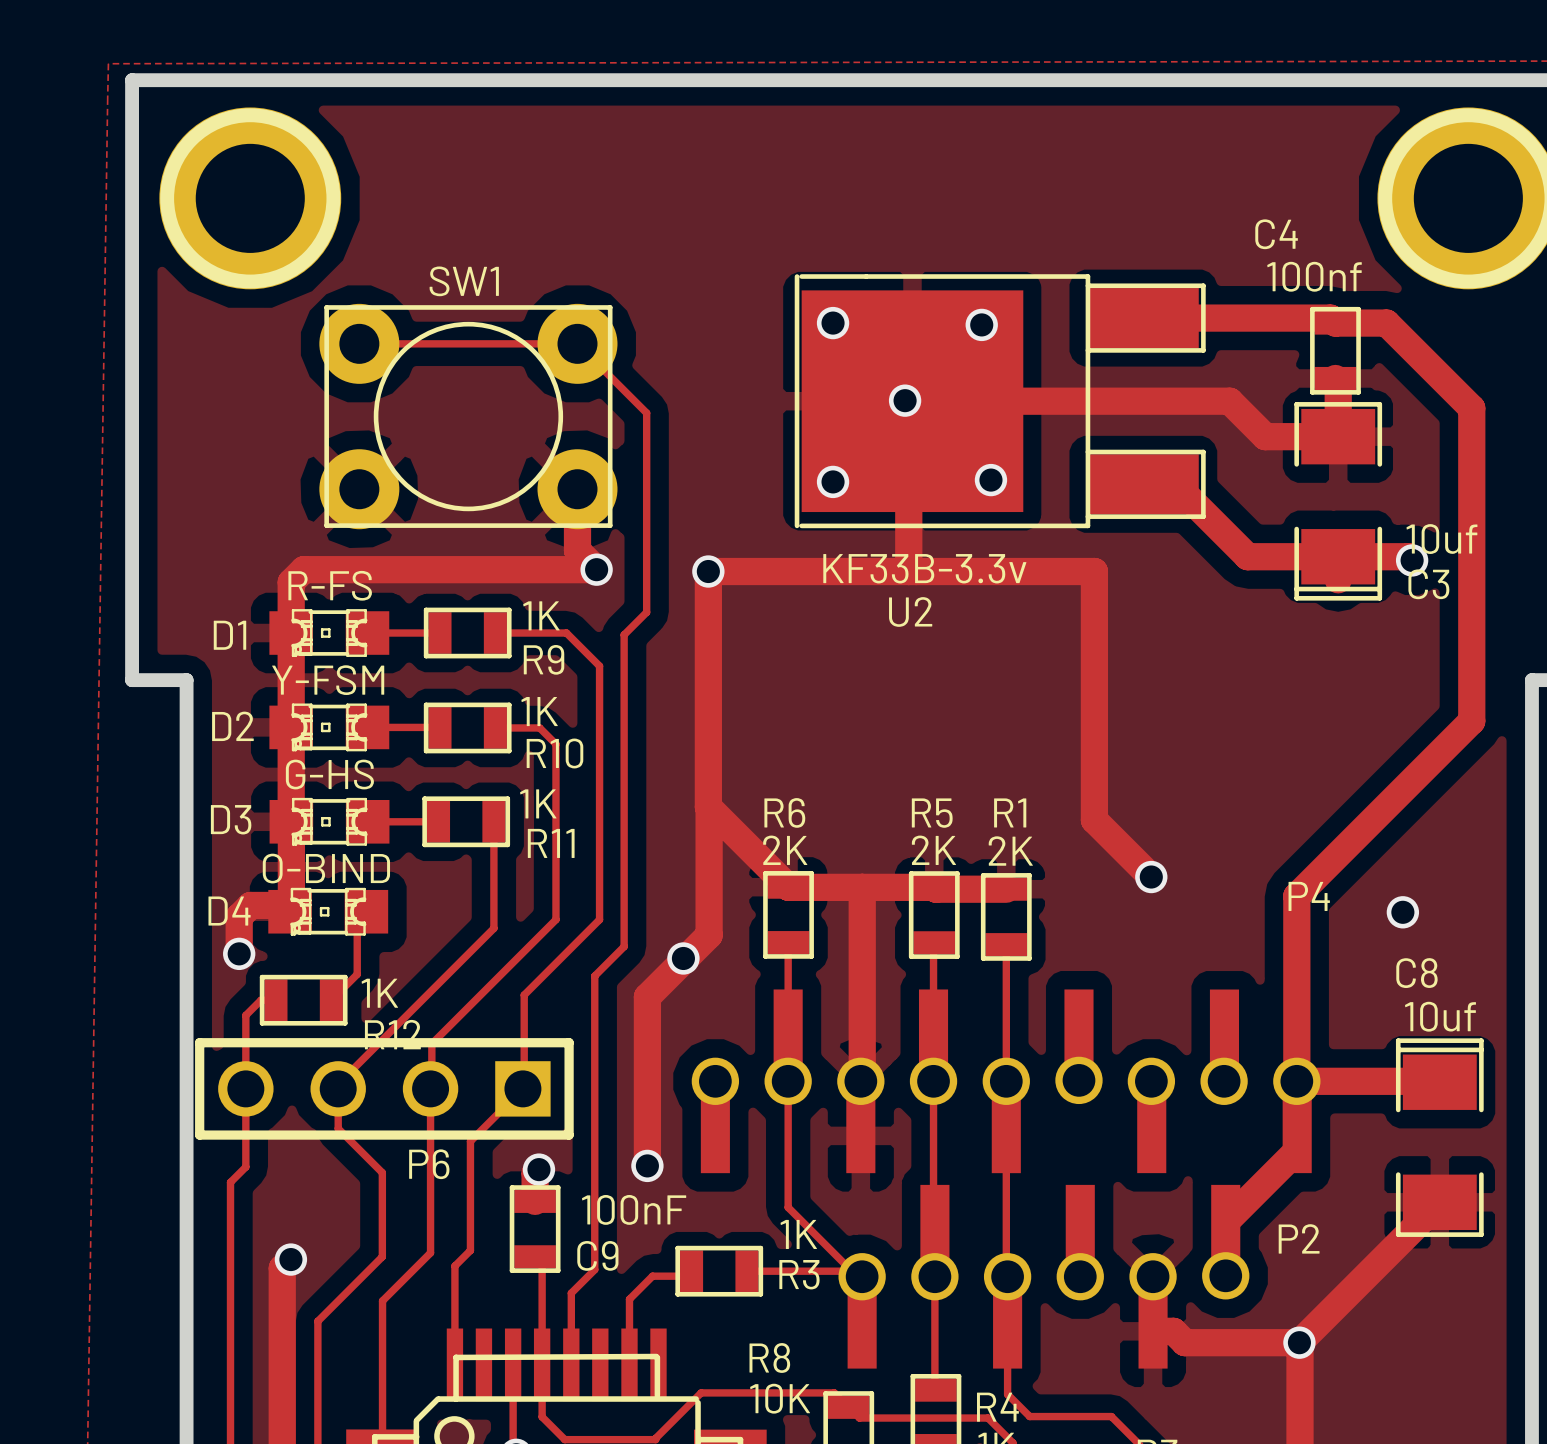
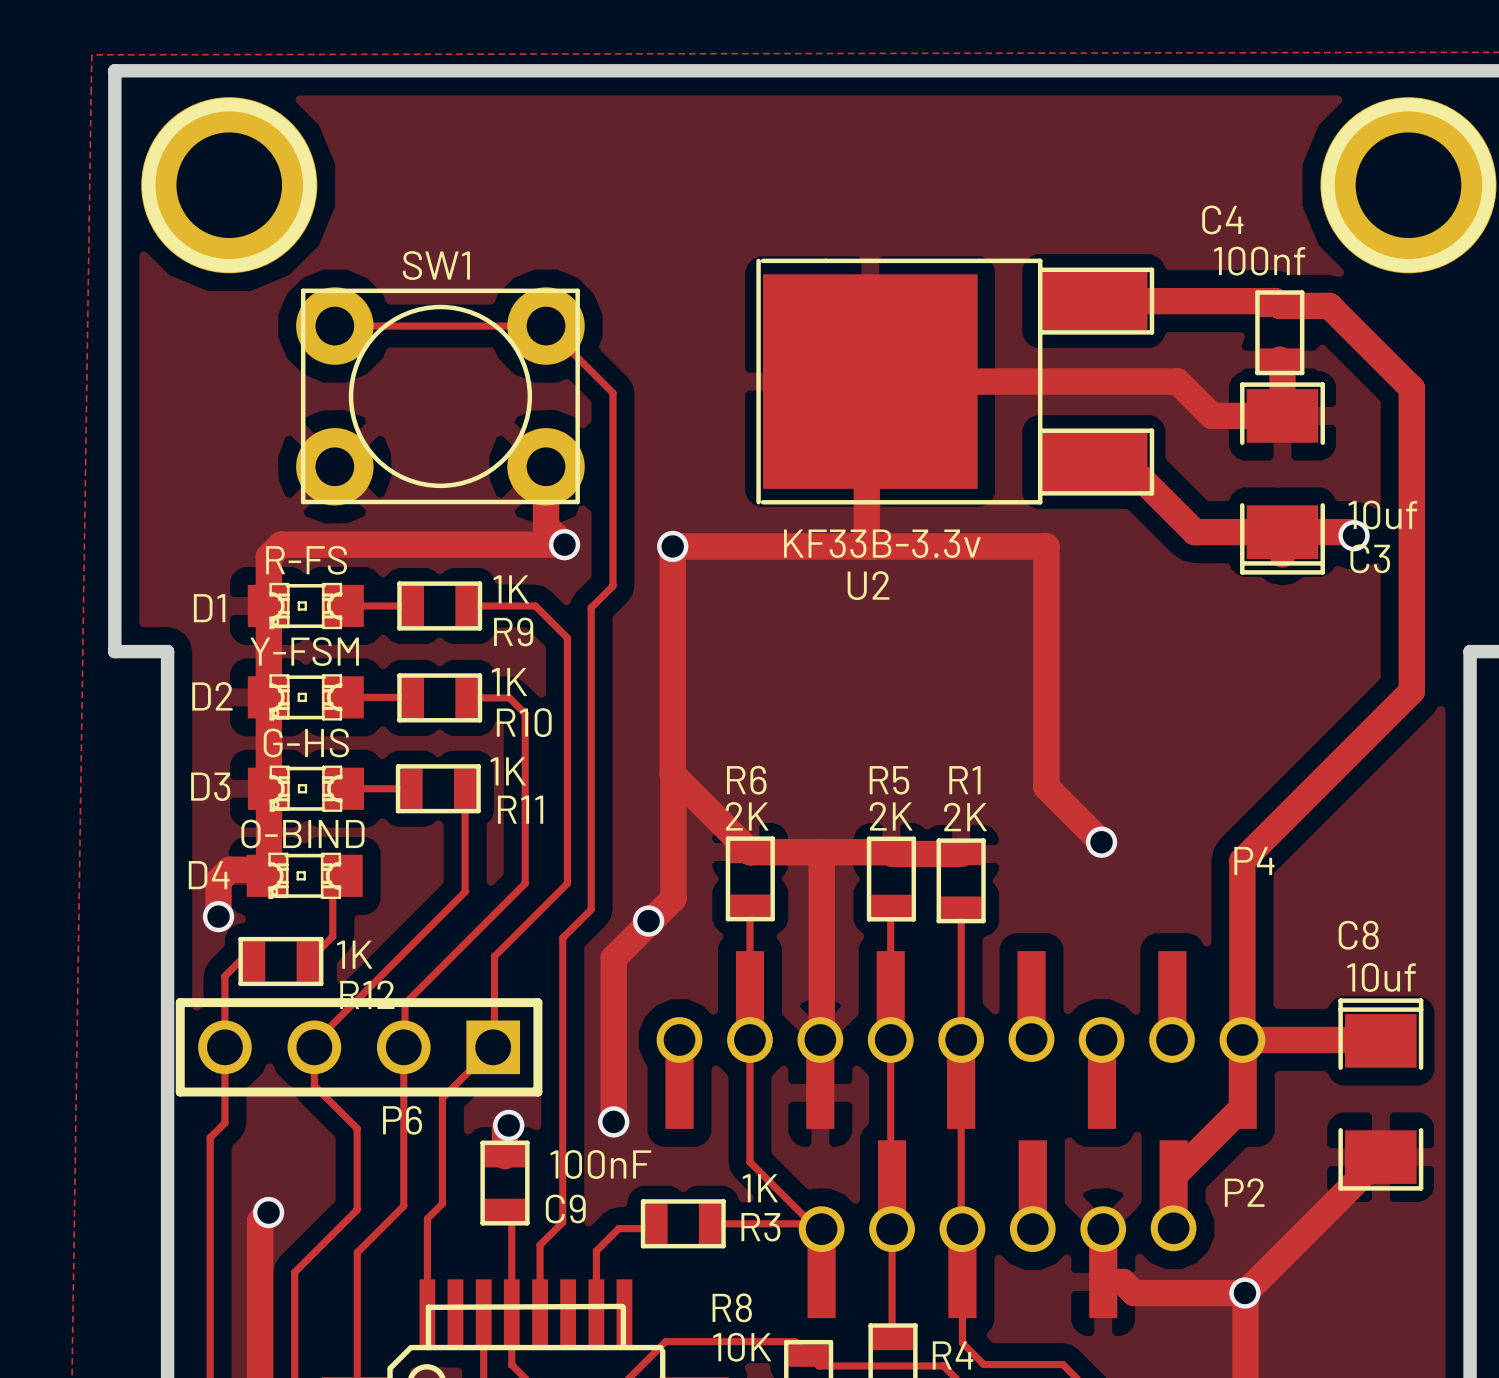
via: (833, 323) -> none
via: (981, 324) -> none
via: (905, 400) -> none
via: (990, 480) -> none
via: (833, 481) -> none
via: (1402, 912) -> none

